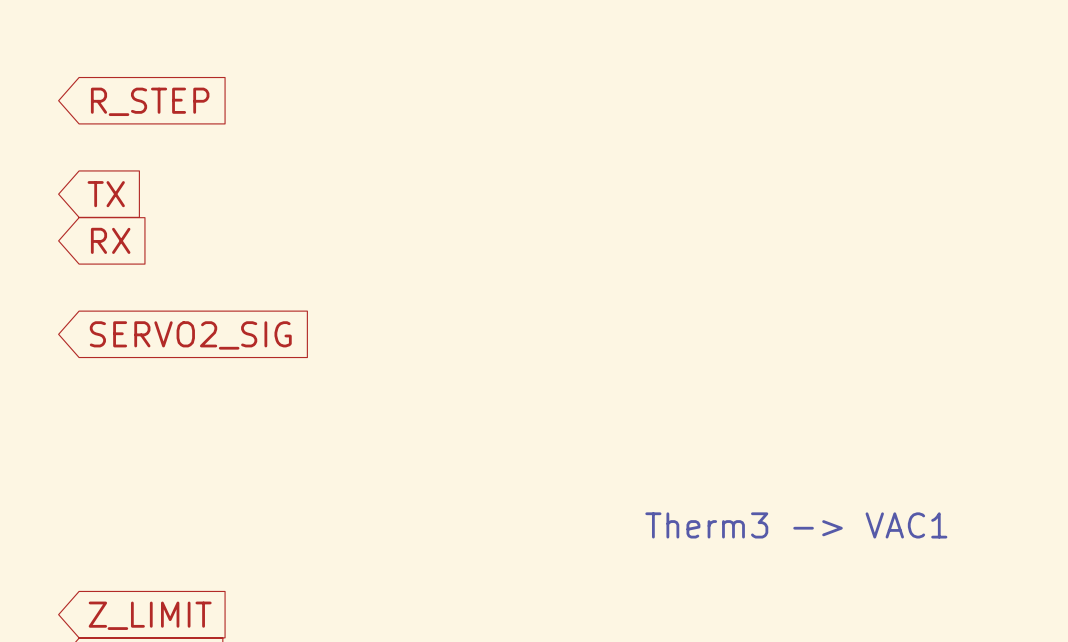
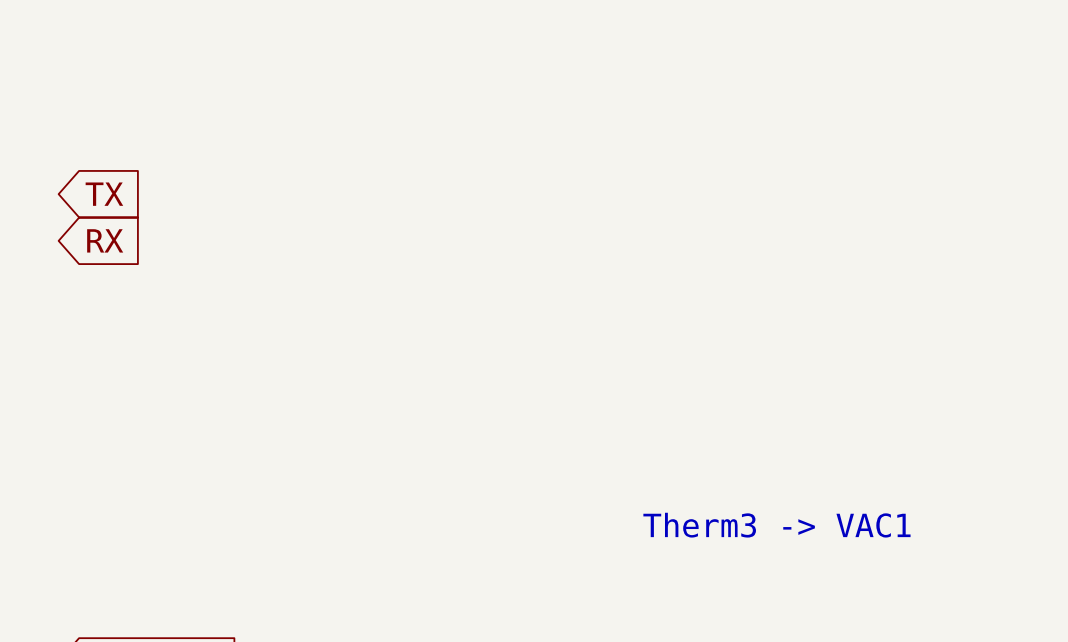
global label: R_STEP (150, 101) -> none
global label: SERVO2_SIG (190, 335) -> none
global label: Z_LIMIT (150, 615) -> none

